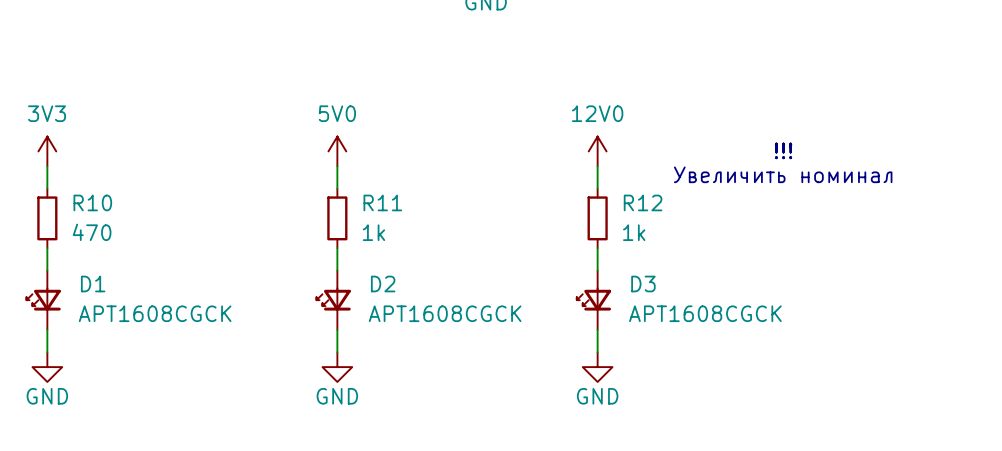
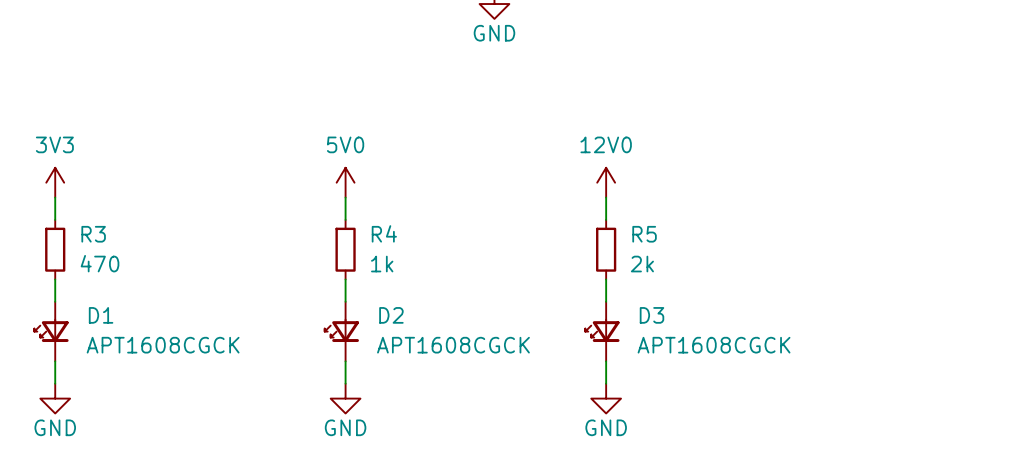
text: !!! (783, 150) -> none
text: Увеличить номинал (783, 174) -> none
R10 name: R10 (92, 202) -> R3 (93, 234)
R11 name: R11 (382, 202) -> R4 (384, 233)
R12 name: R12 (643, 202) -> R5 (644, 234)
R12 value: 1k (634, 232) -> 2k (642, 264)

